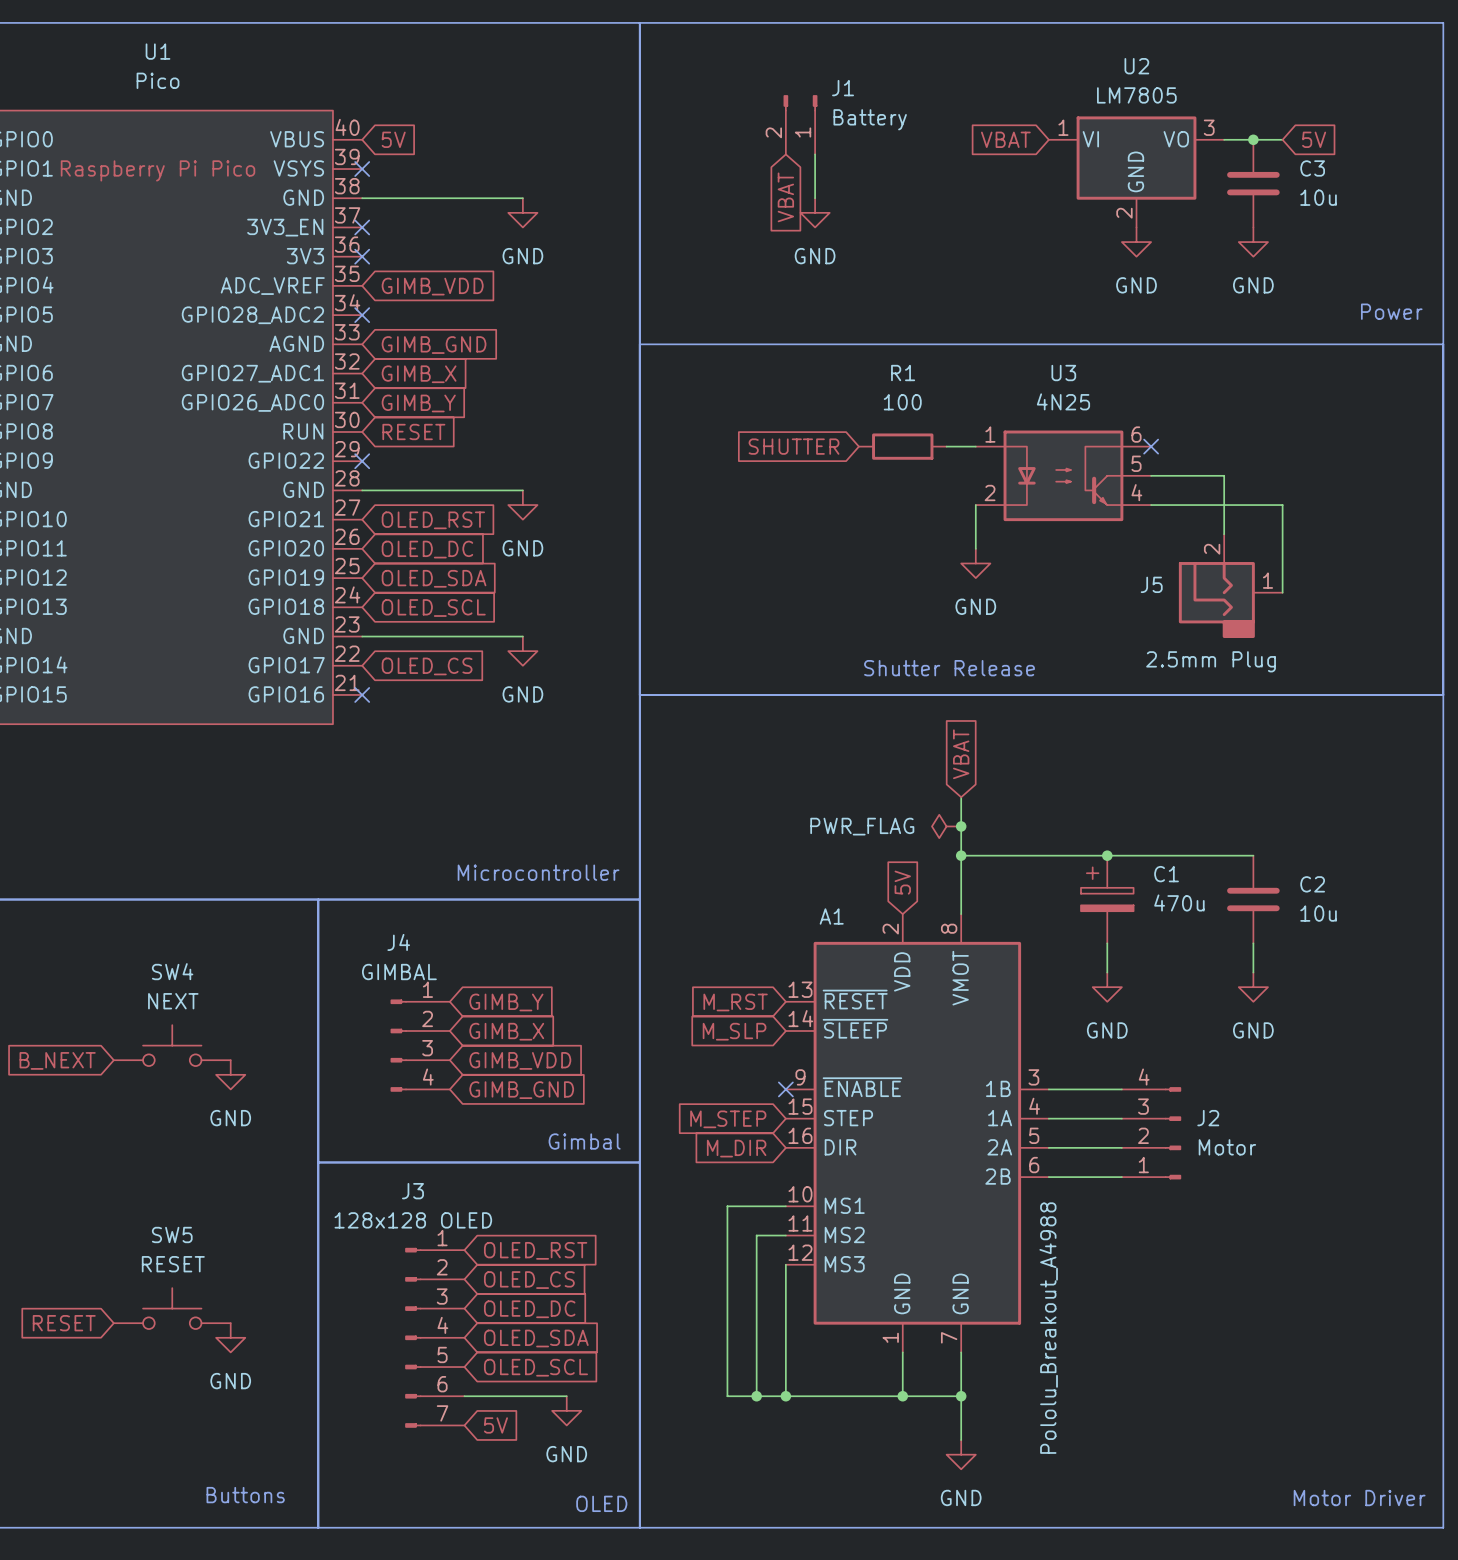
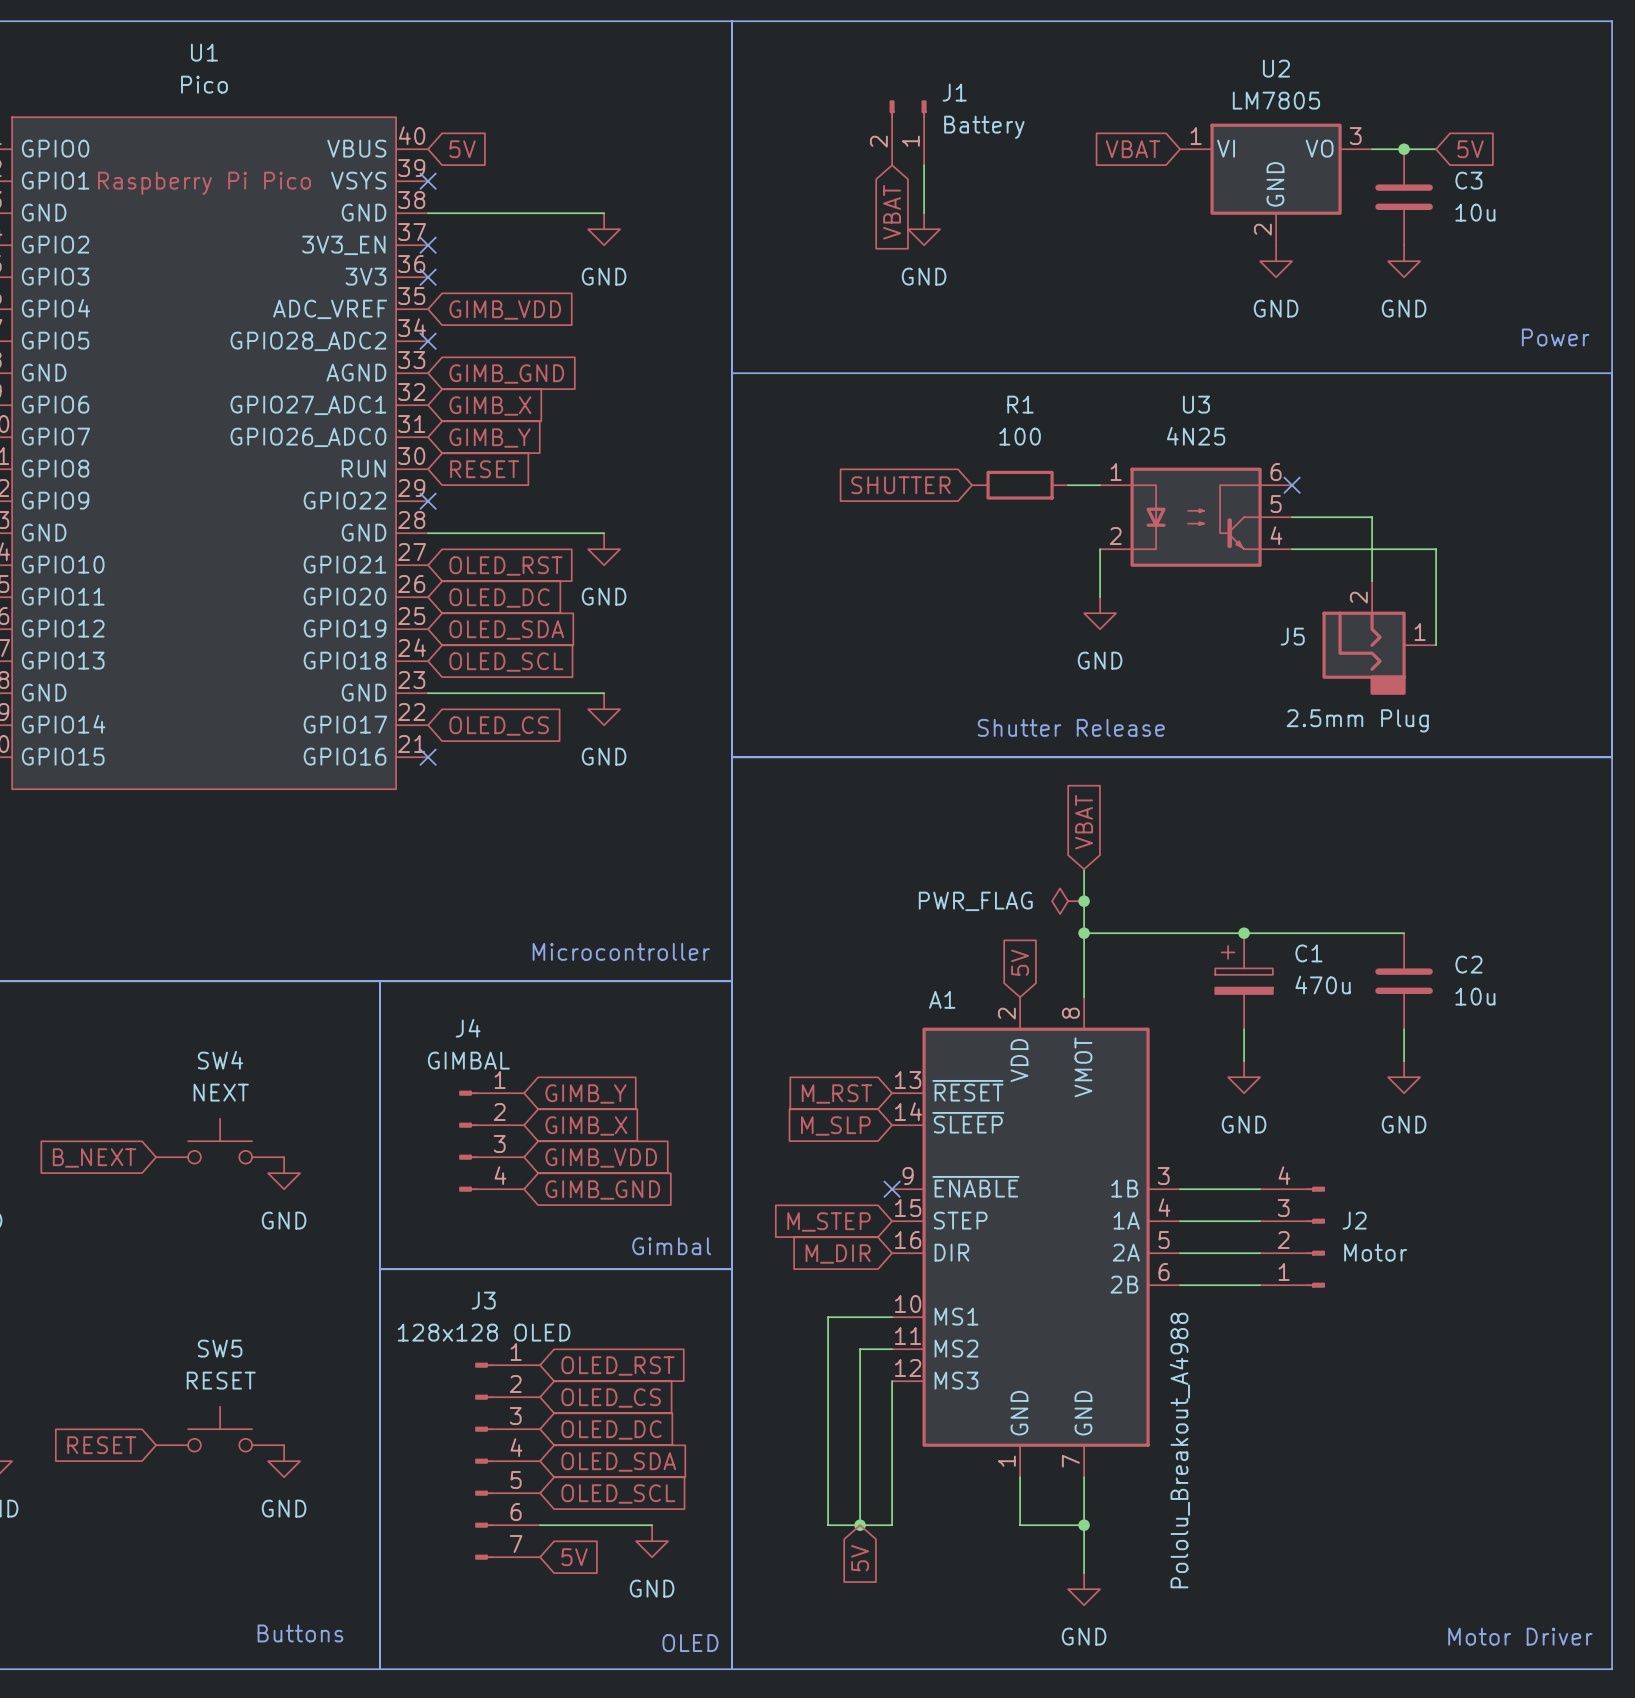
wire: (785, 1396) (902, 1396) -> none
junction: (785, 1396) -> none
junction: (902, 1396) -> none
global label: none -> 5V (860, 1558)

